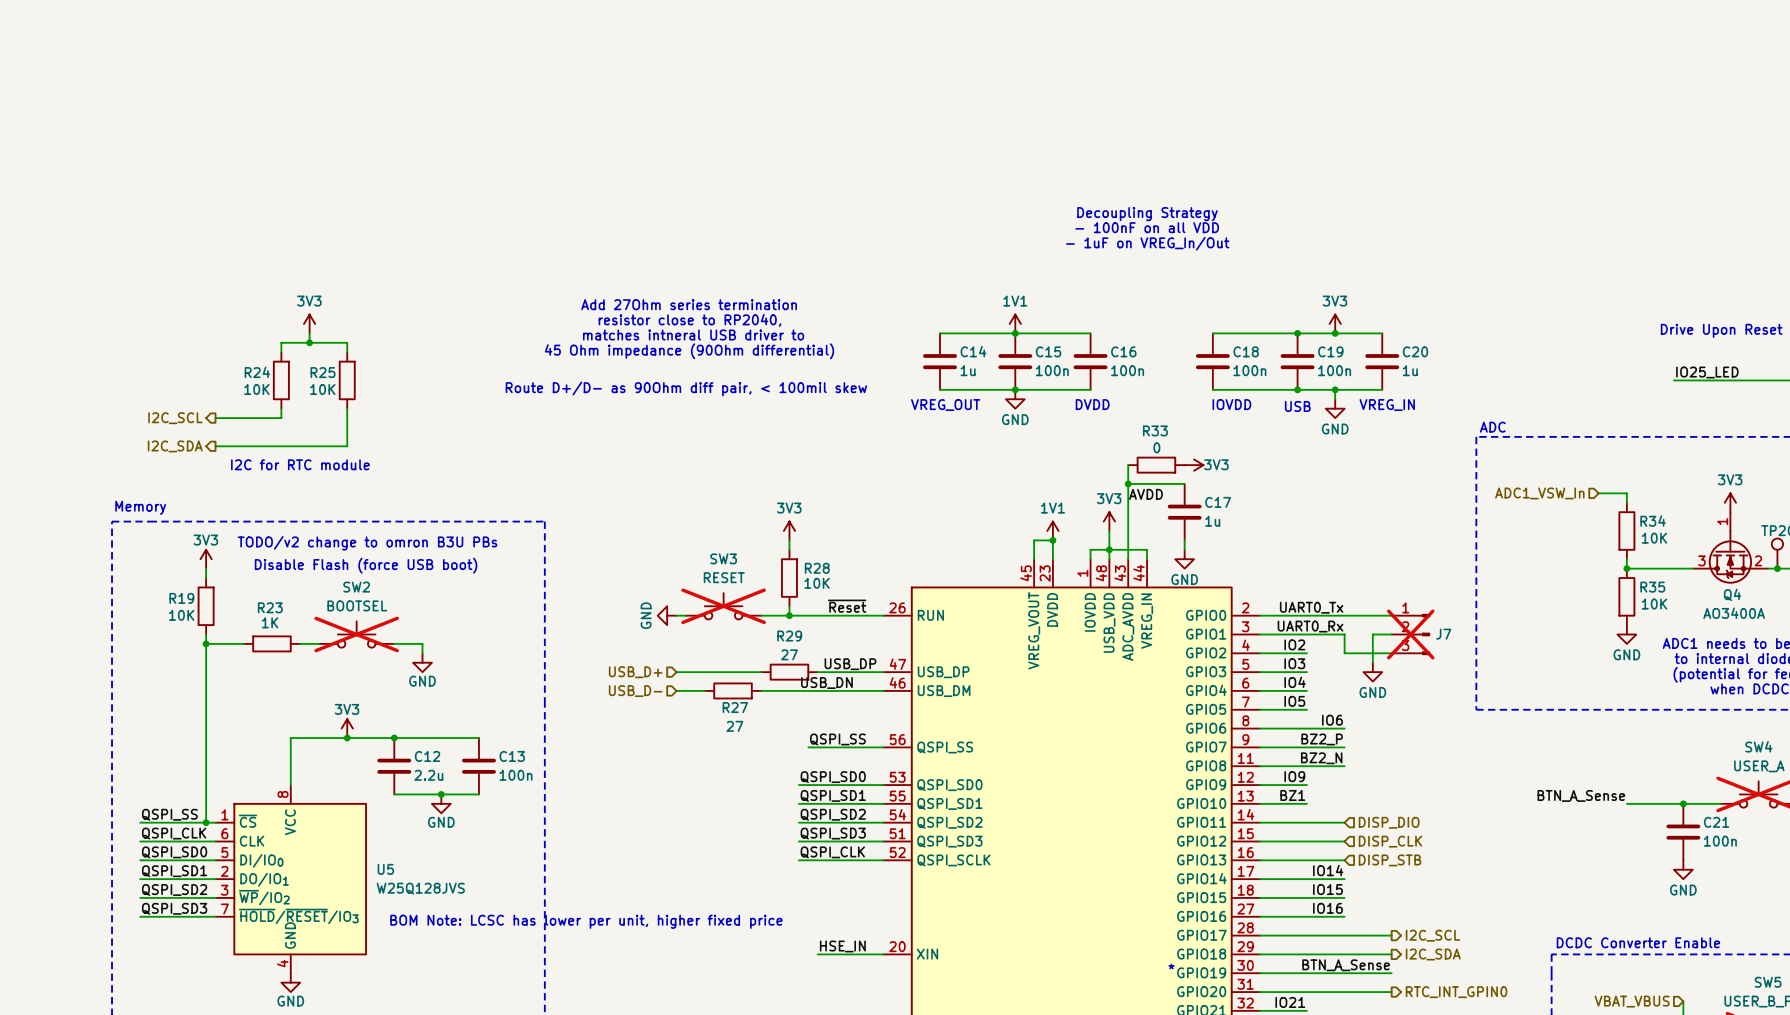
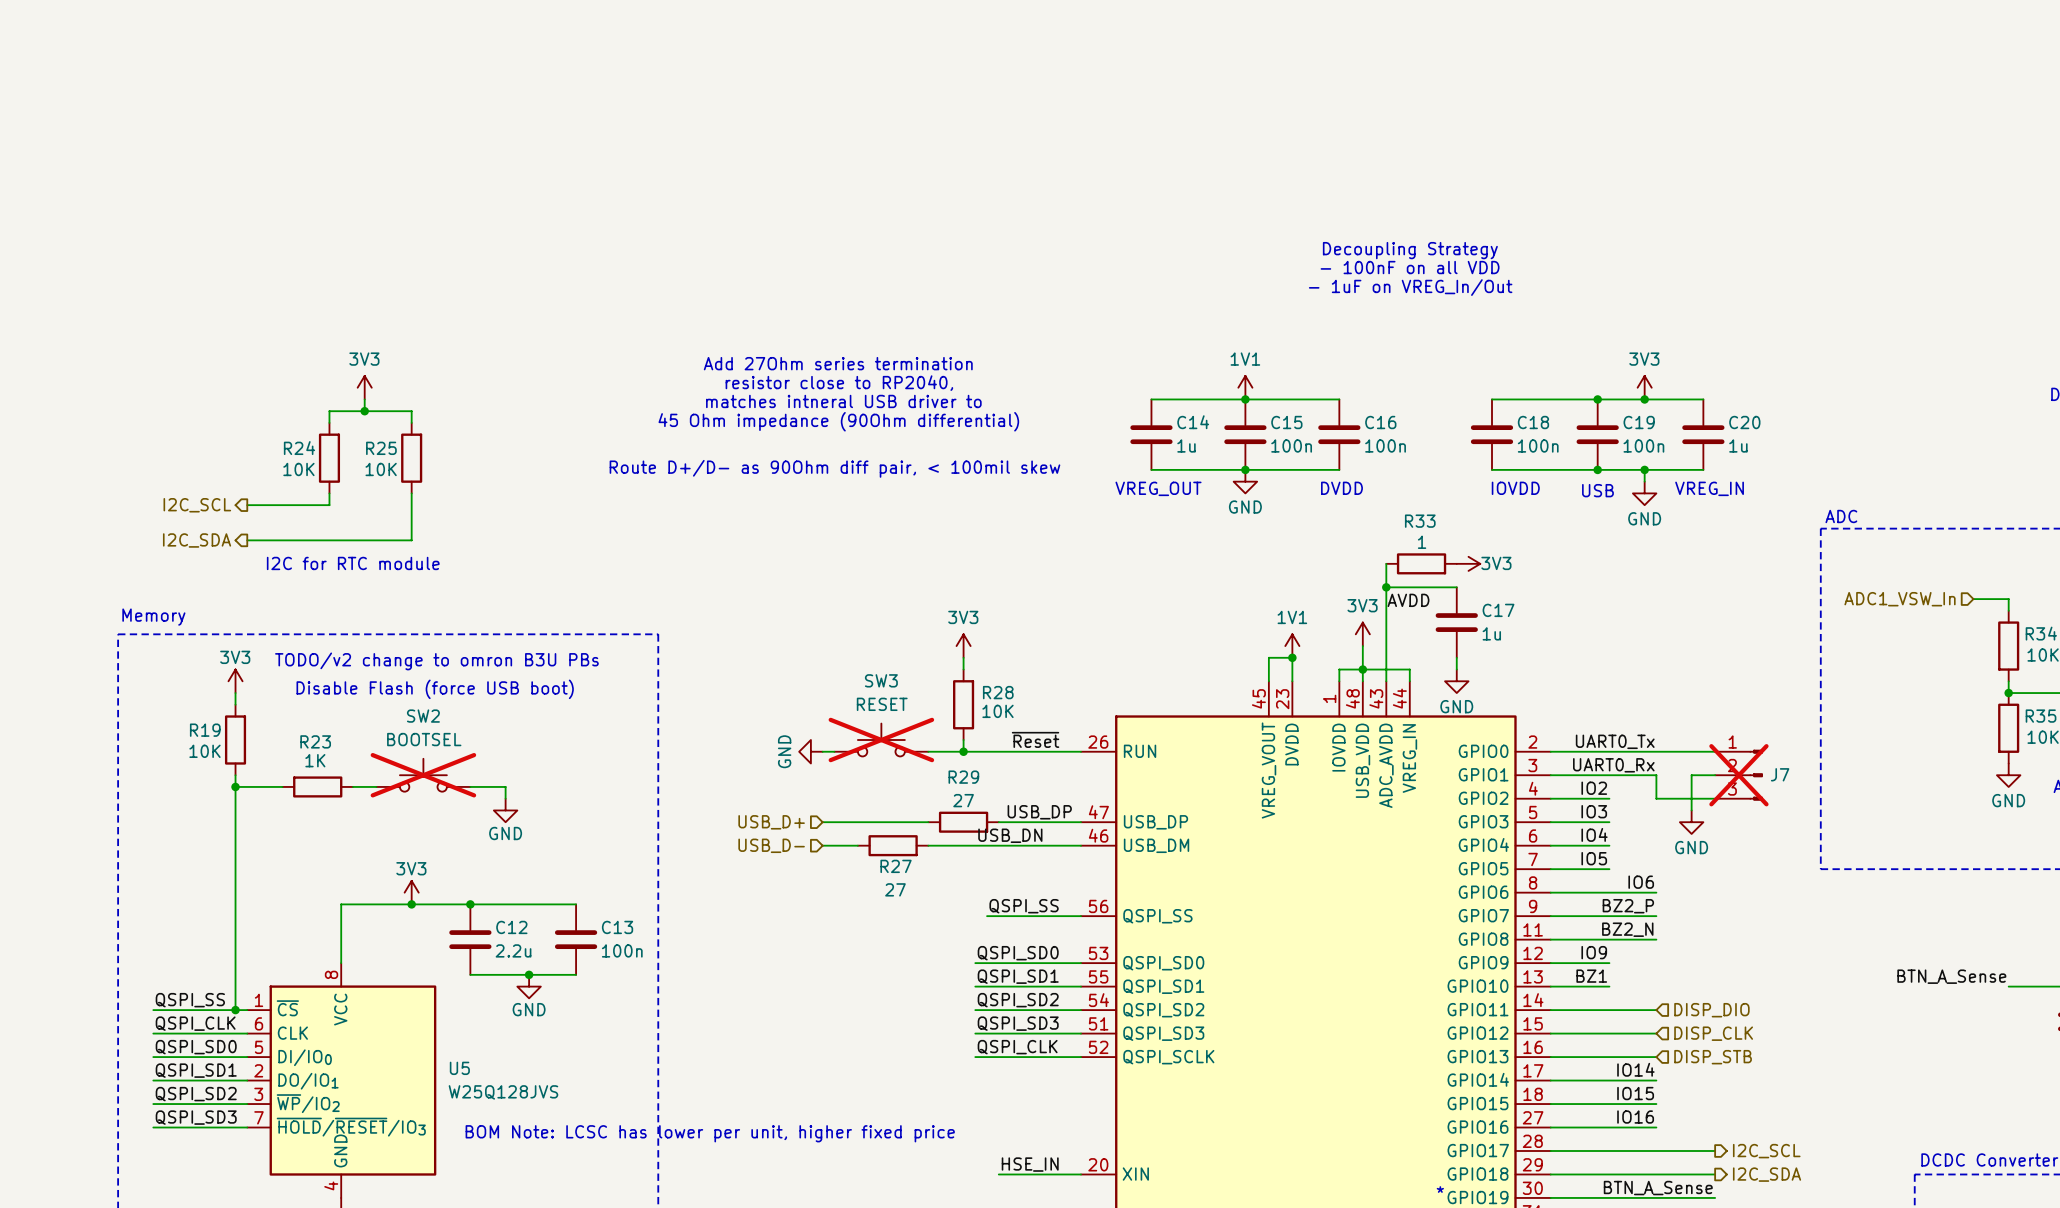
R33 value: 0 (1156, 447) -> 1 (1422, 542)

